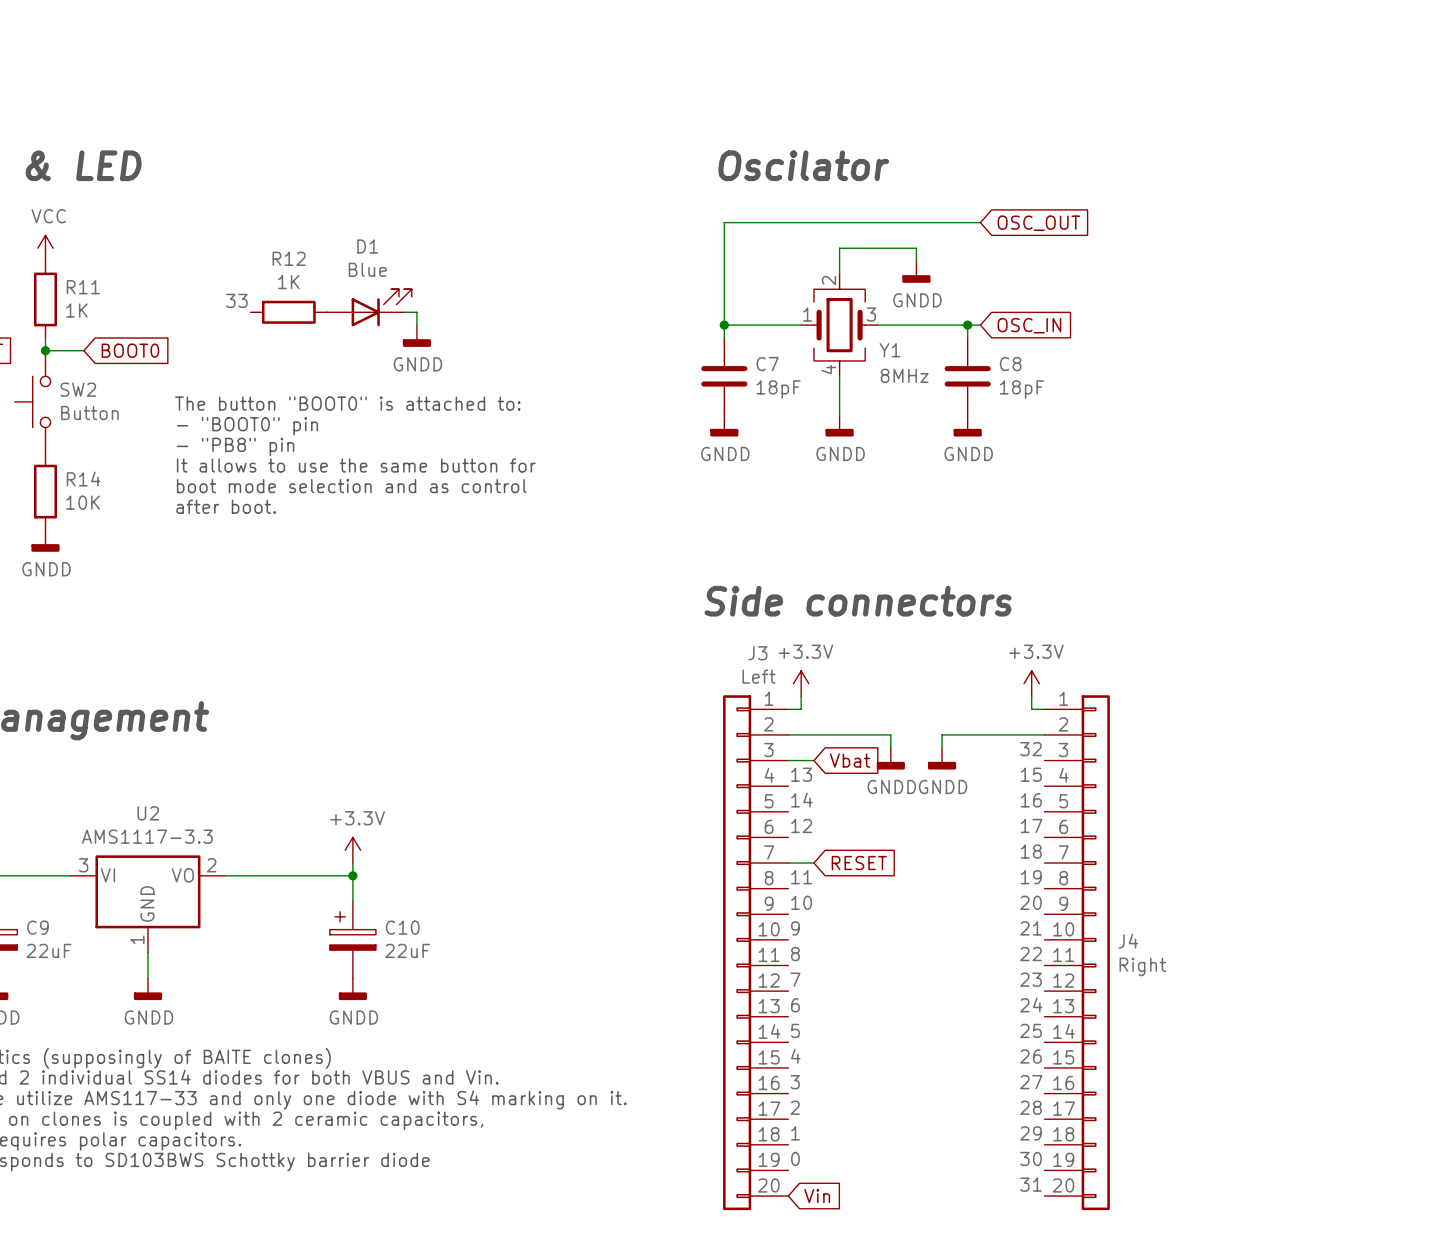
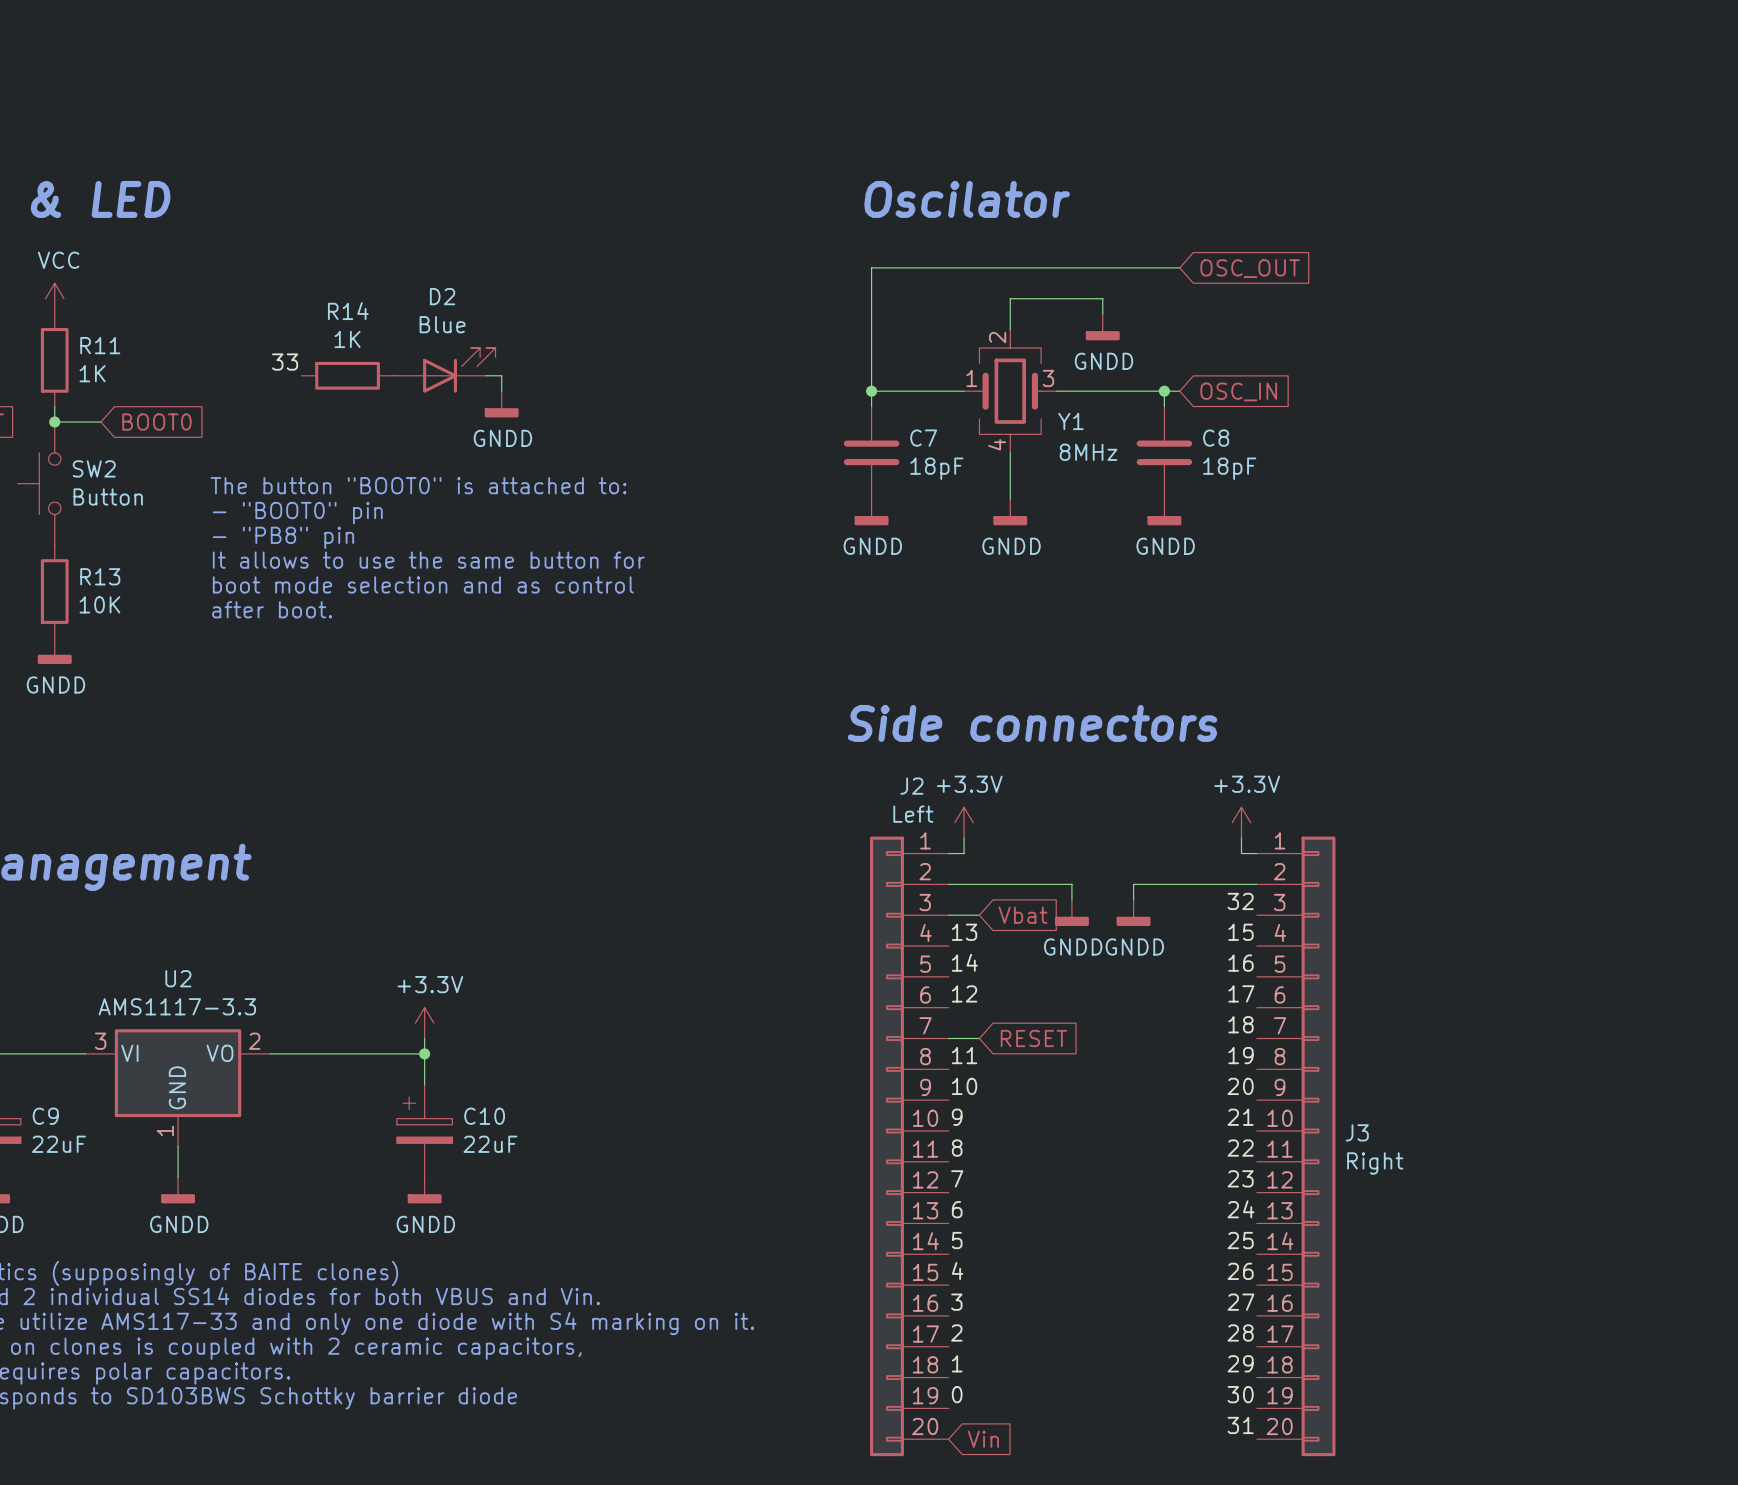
D1 name: D1 (367, 246) -> D2 (442, 296)
R12 name: R12 (289, 258) -> R14 (348, 311)
R14 name: R14 (83, 479) -> R13 (100, 576)
J3 name: J3 (757, 653) -> J2 (911, 786)
J4 name: J4 (1128, 941) -> J3 (1357, 1132)

